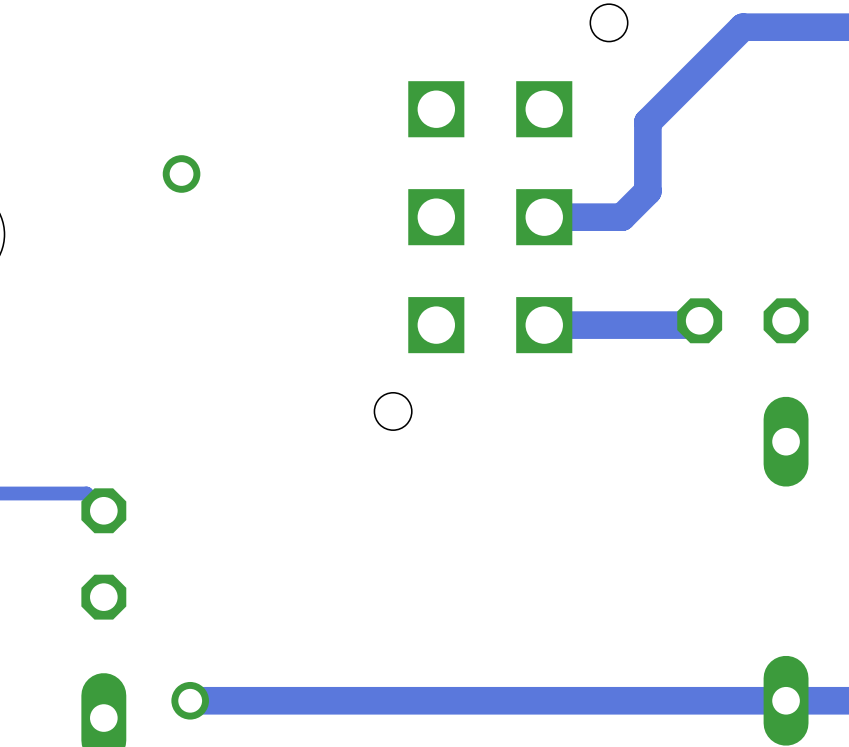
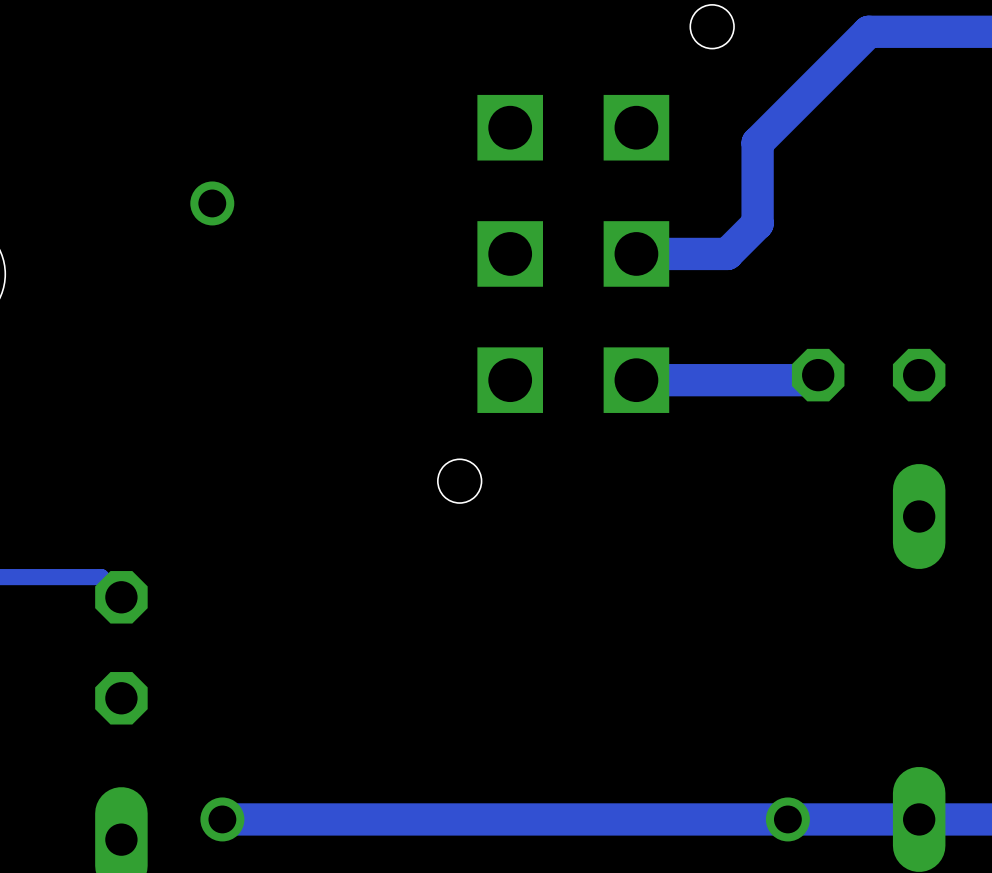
via: none -> (787, 819)

